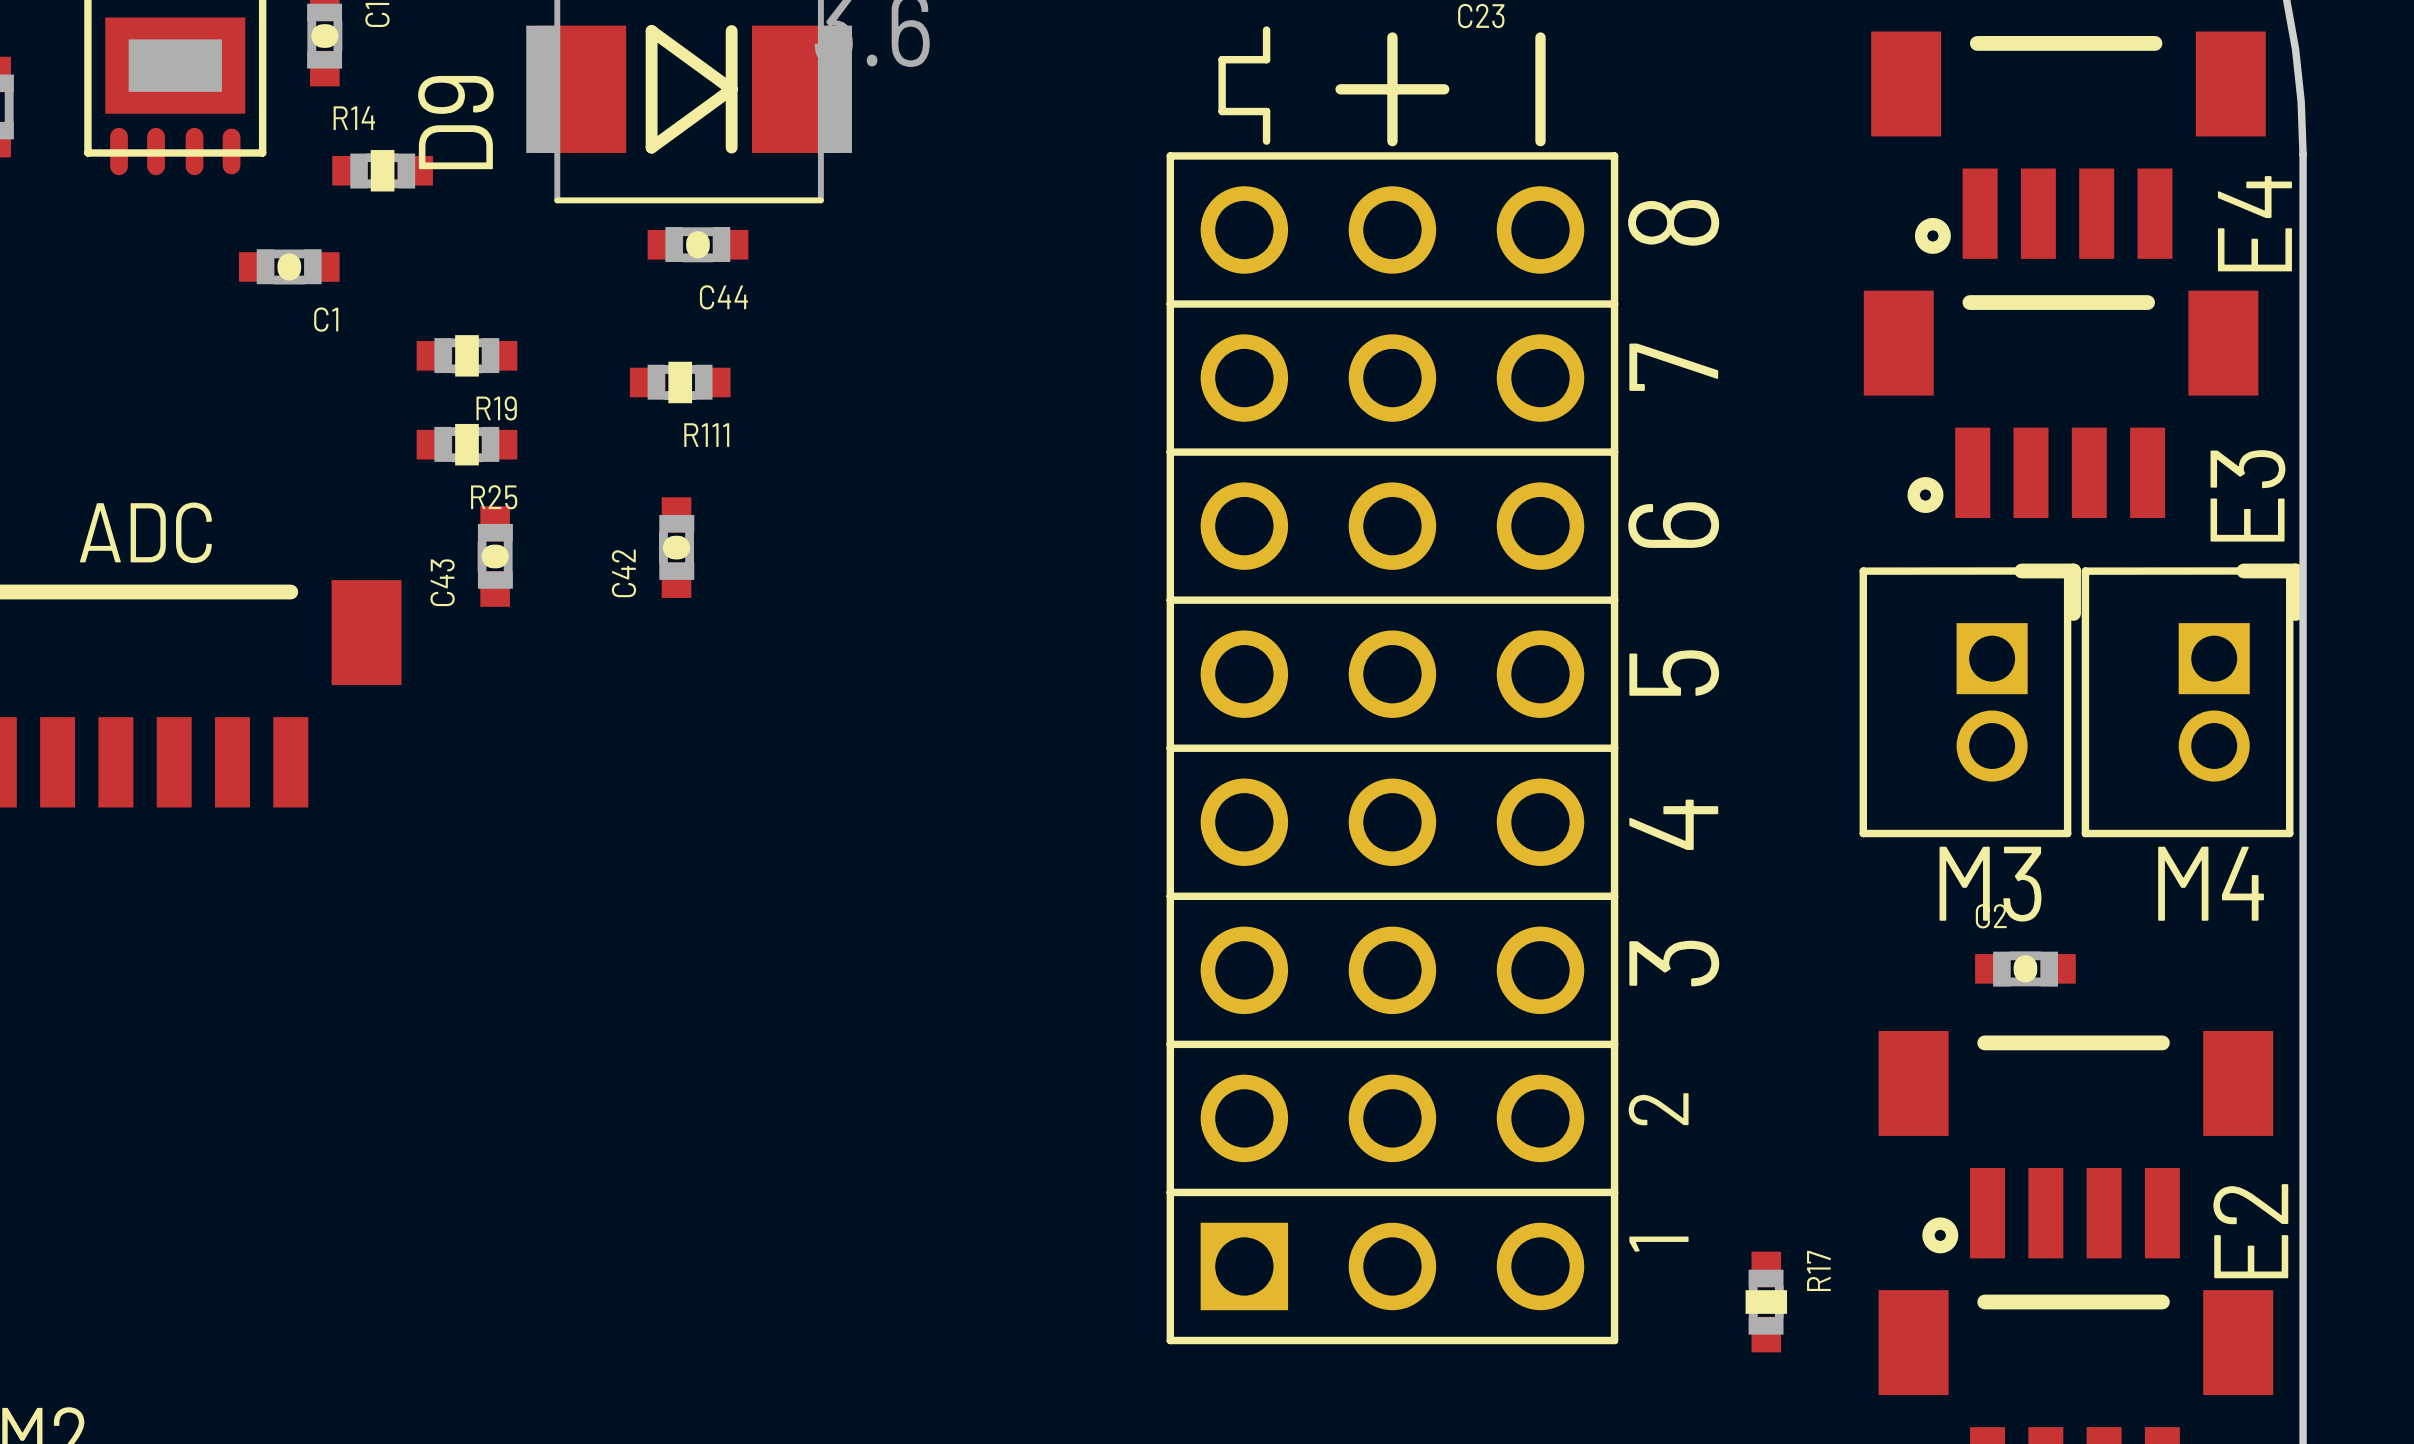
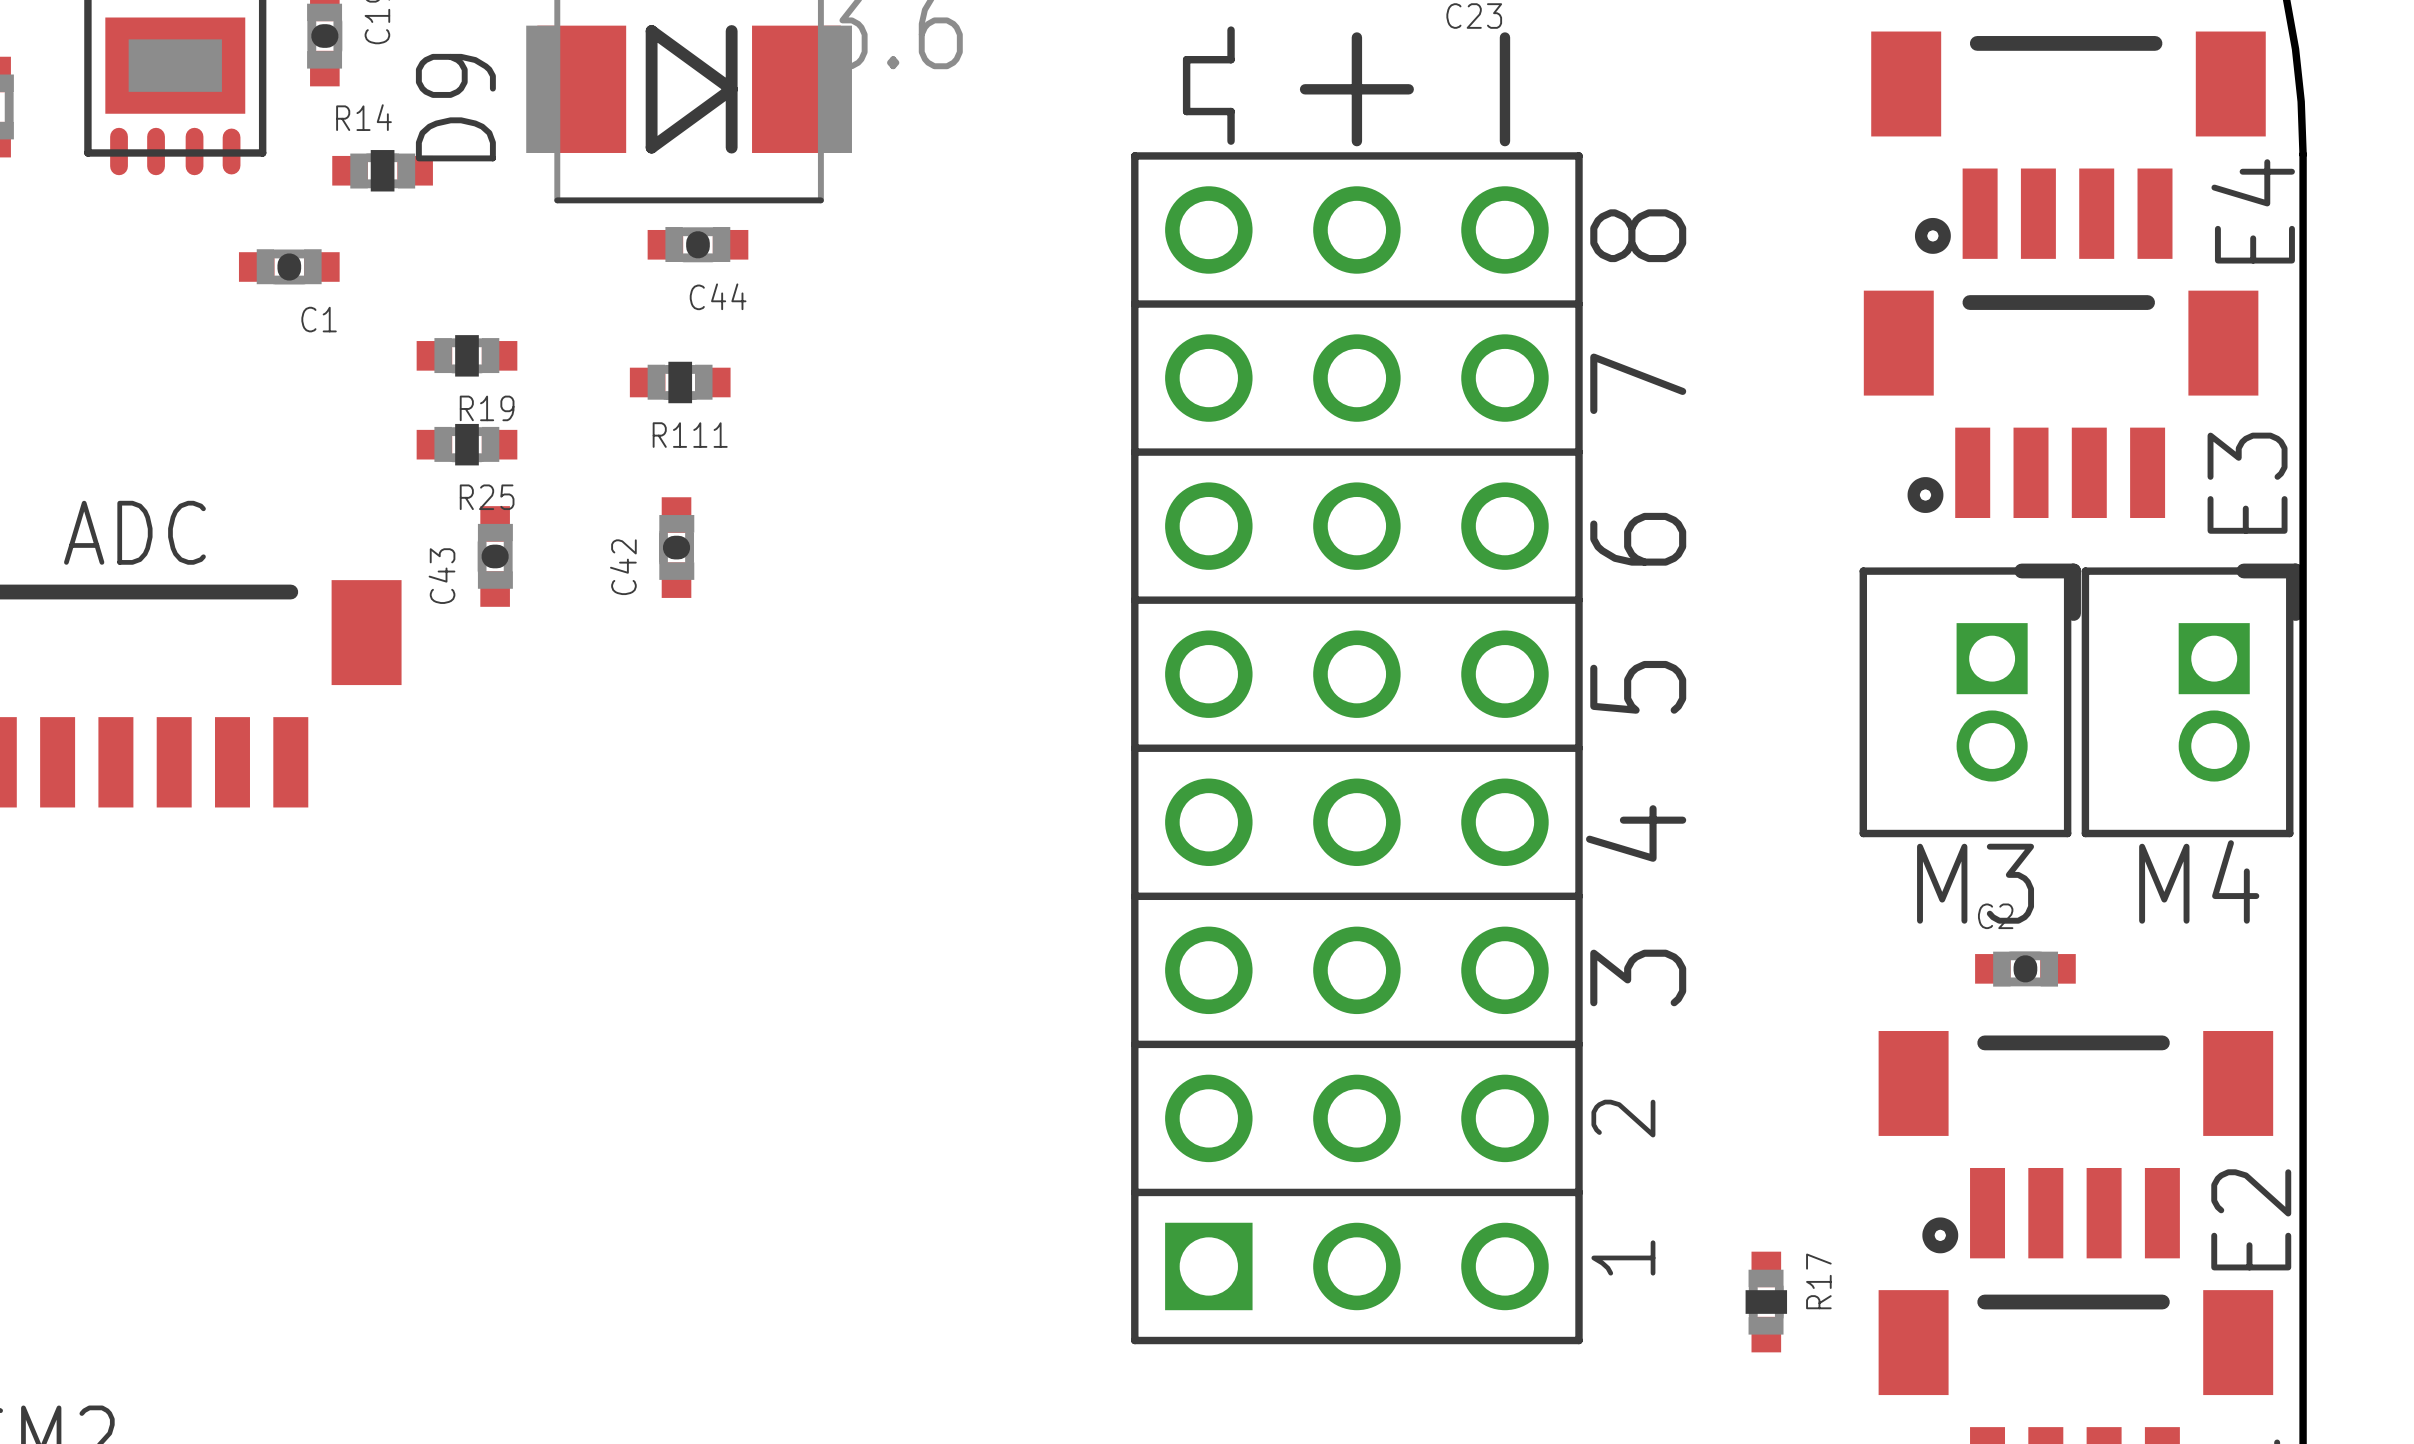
part position: (1392, 685) -> (1356, 685)

